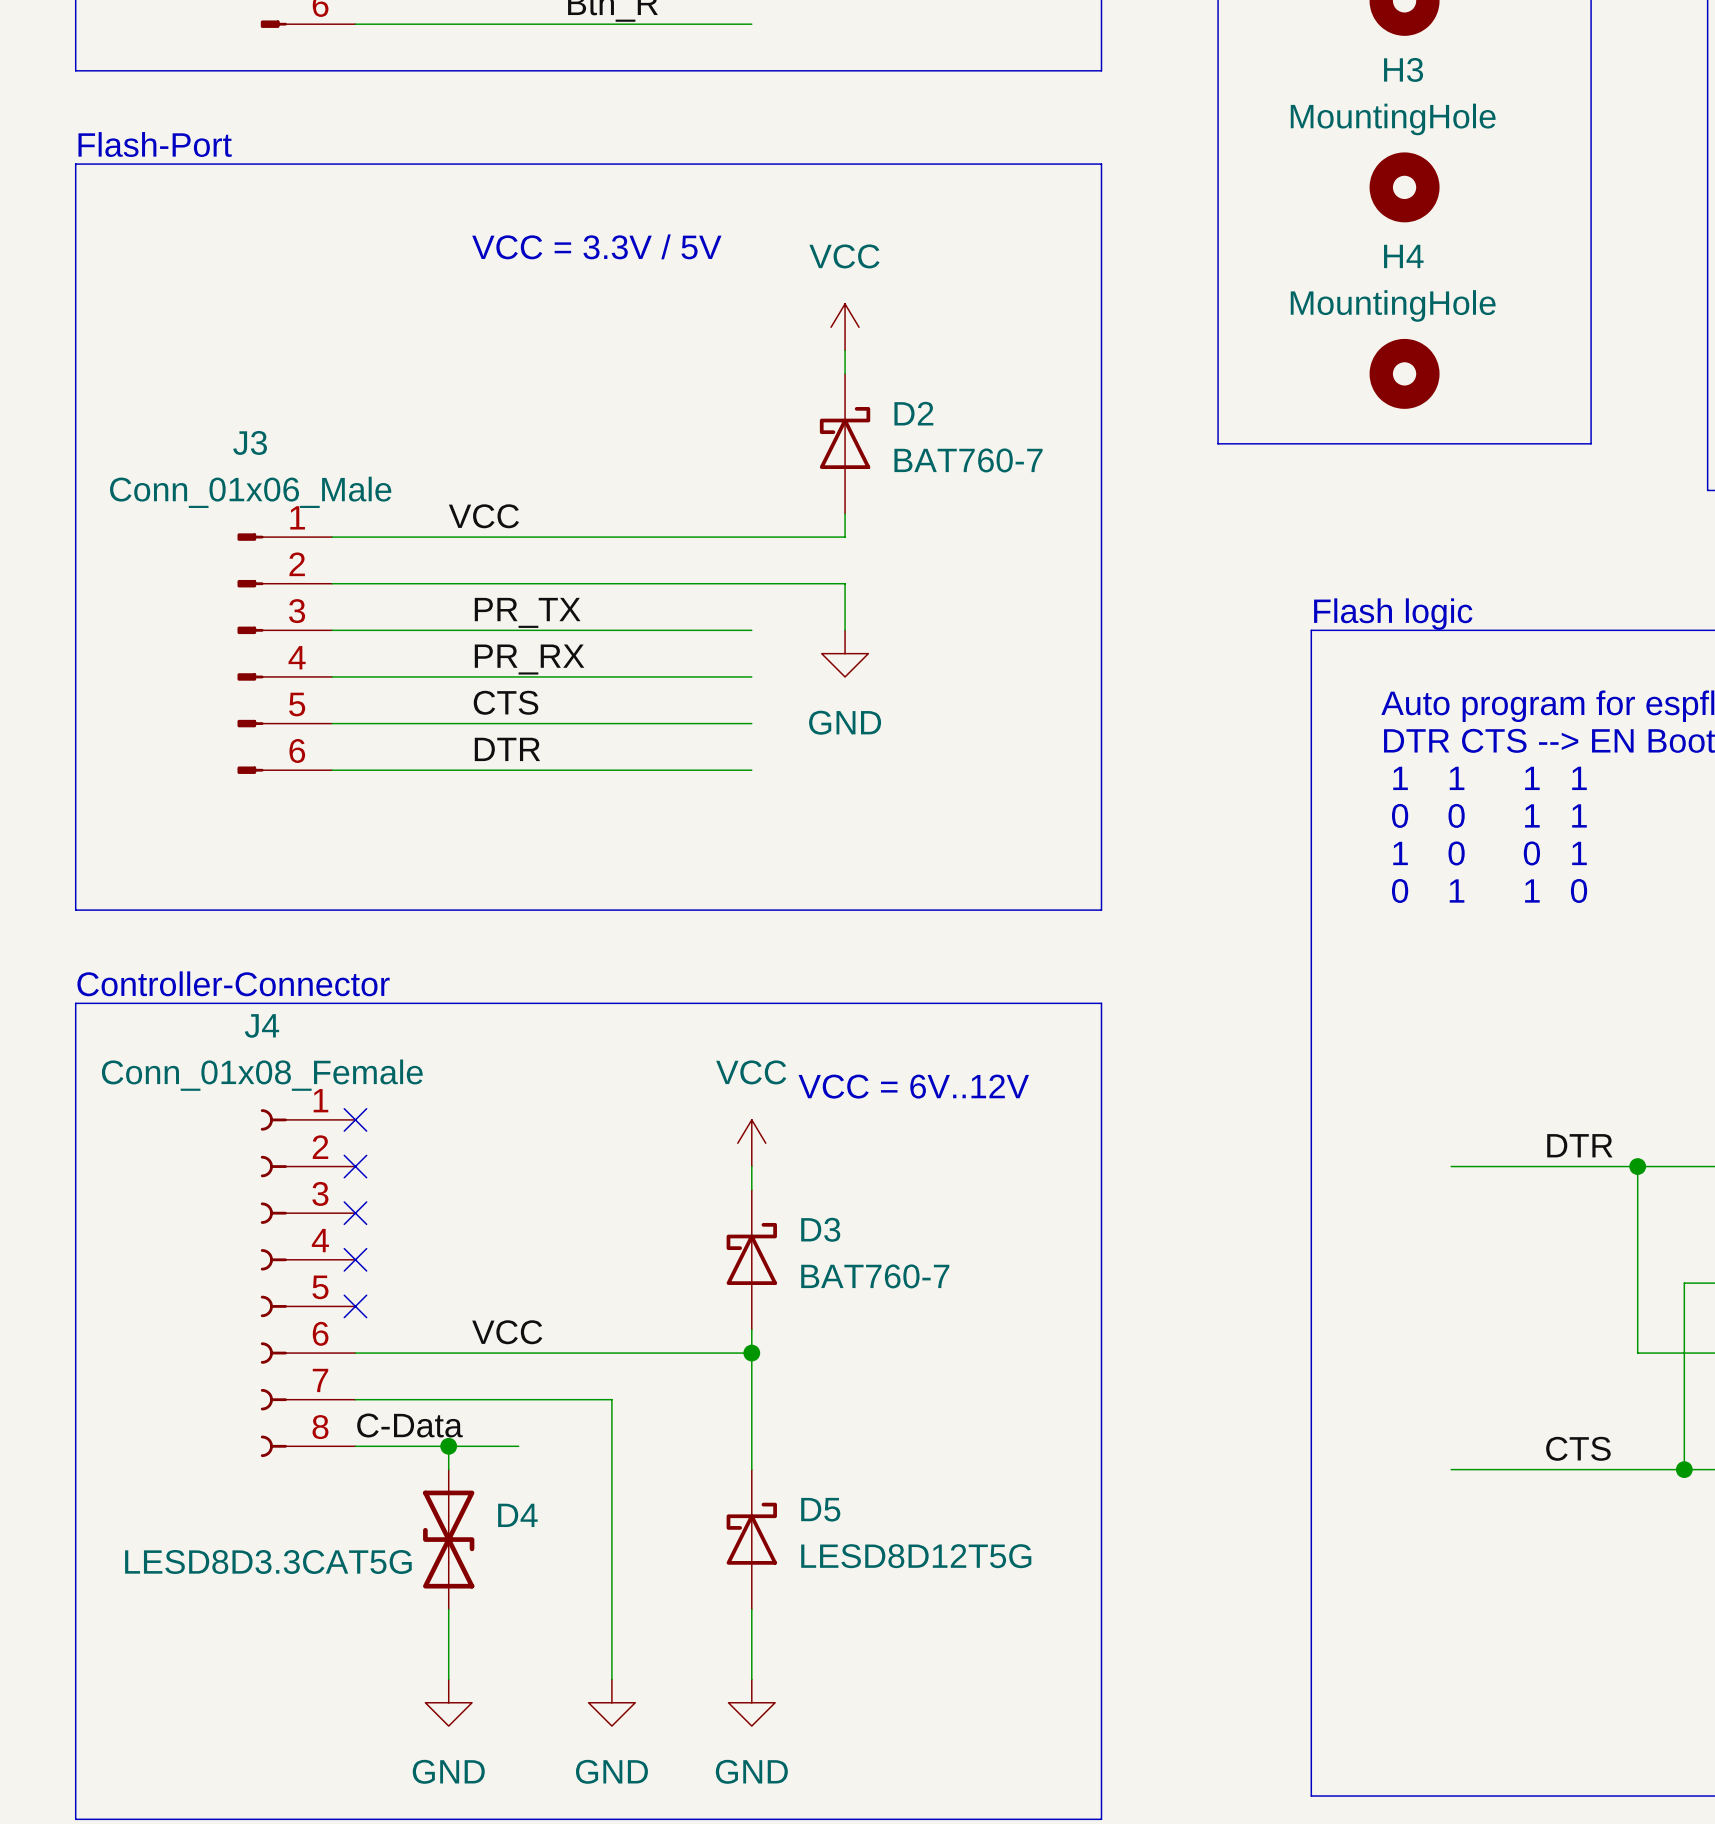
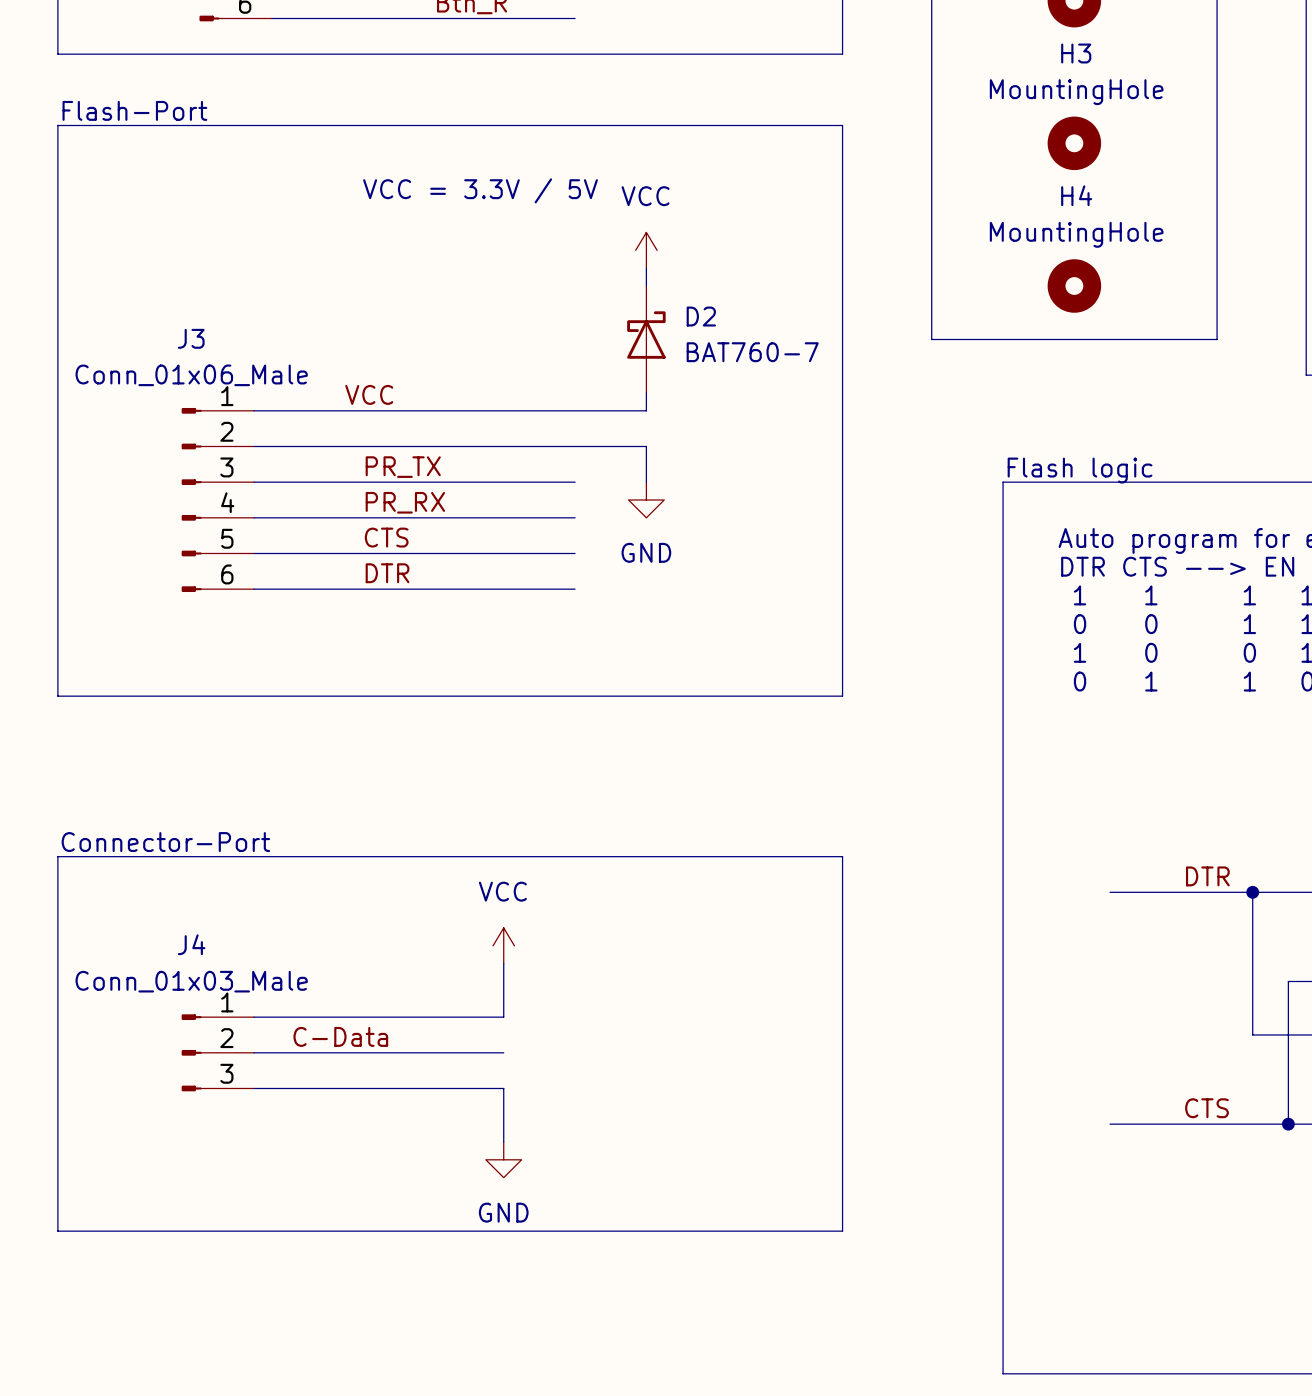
text: Controller-Connector (233, 983) -> none
J4 name position: J4 (261, 1025) -> J4 (191, 944)
J4 value: Conn_01x08_Female (262, 1075) -> Conn_01x03_Male (191, 981)
text: VCC = 6V..12V (913, 1086) -> none
text: none -> Connector-Port (165, 842)
J4 symbol: [260, 1109, 356, 1458] -> [181, 1014, 255, 1092]
line: (75, 1119) (75, 1003) (1101, 1003) (1101, 1119) -> (57, 856) (842, 856)
no-connect mark: (355, 1119) -> none
power symbol position: VCC (751, 1143) -> VCC (503, 945)
no-connect mark: (355, 1166) -> none
wire: (751, 1166) (751, 1189) -> none
no-connect mark: (355, 1213) -> none
no-connect mark: (355, 1259) -> none
wire: none -> (503, 963) (503, 1017) (254, 1017)
D3: BAT760-7 (751, 1259) -> none
no-connect mark: (355, 1306) -> none
wire: (751, 1329) (751, 1469) -> none
label: VCC (507, 1332) -> none
wire: (355, 1353) (751, 1353) -> none
junction: (751, 1353) -> none
wire: none -> (254, 1052) (503, 1052)
wire: (355, 1399) (611, 1399) (611, 1679) -> none
wire: none -> (254, 1088) (503, 1088) (503, 1141)
label position: C-Data (409, 1425) -> C-Data (340, 1036)
wire: (355, 1446) (518, 1446) -> none
wire: (448, 1446) (448, 1469) -> none
junction: (448, 1446) -> none
power symbol: none -> GND (503, 1159)
D4: LESD8D3.3CAT5G (448, 1539) -> none
D5: LESD8D12T5G (751, 1539) -> none
line: (75, 1609) (75, 1819) (1101, 1819) (1101, 1609) -> (57, 1231) (842, 1231)
wire: (448, 1609) (448, 1679) -> none
wire: (751, 1609) (751, 1679) -> none
power symbol: GND (448, 1702) -> none
power symbol: GND (611, 1702) -> none
power symbol: GND (751, 1702) -> none

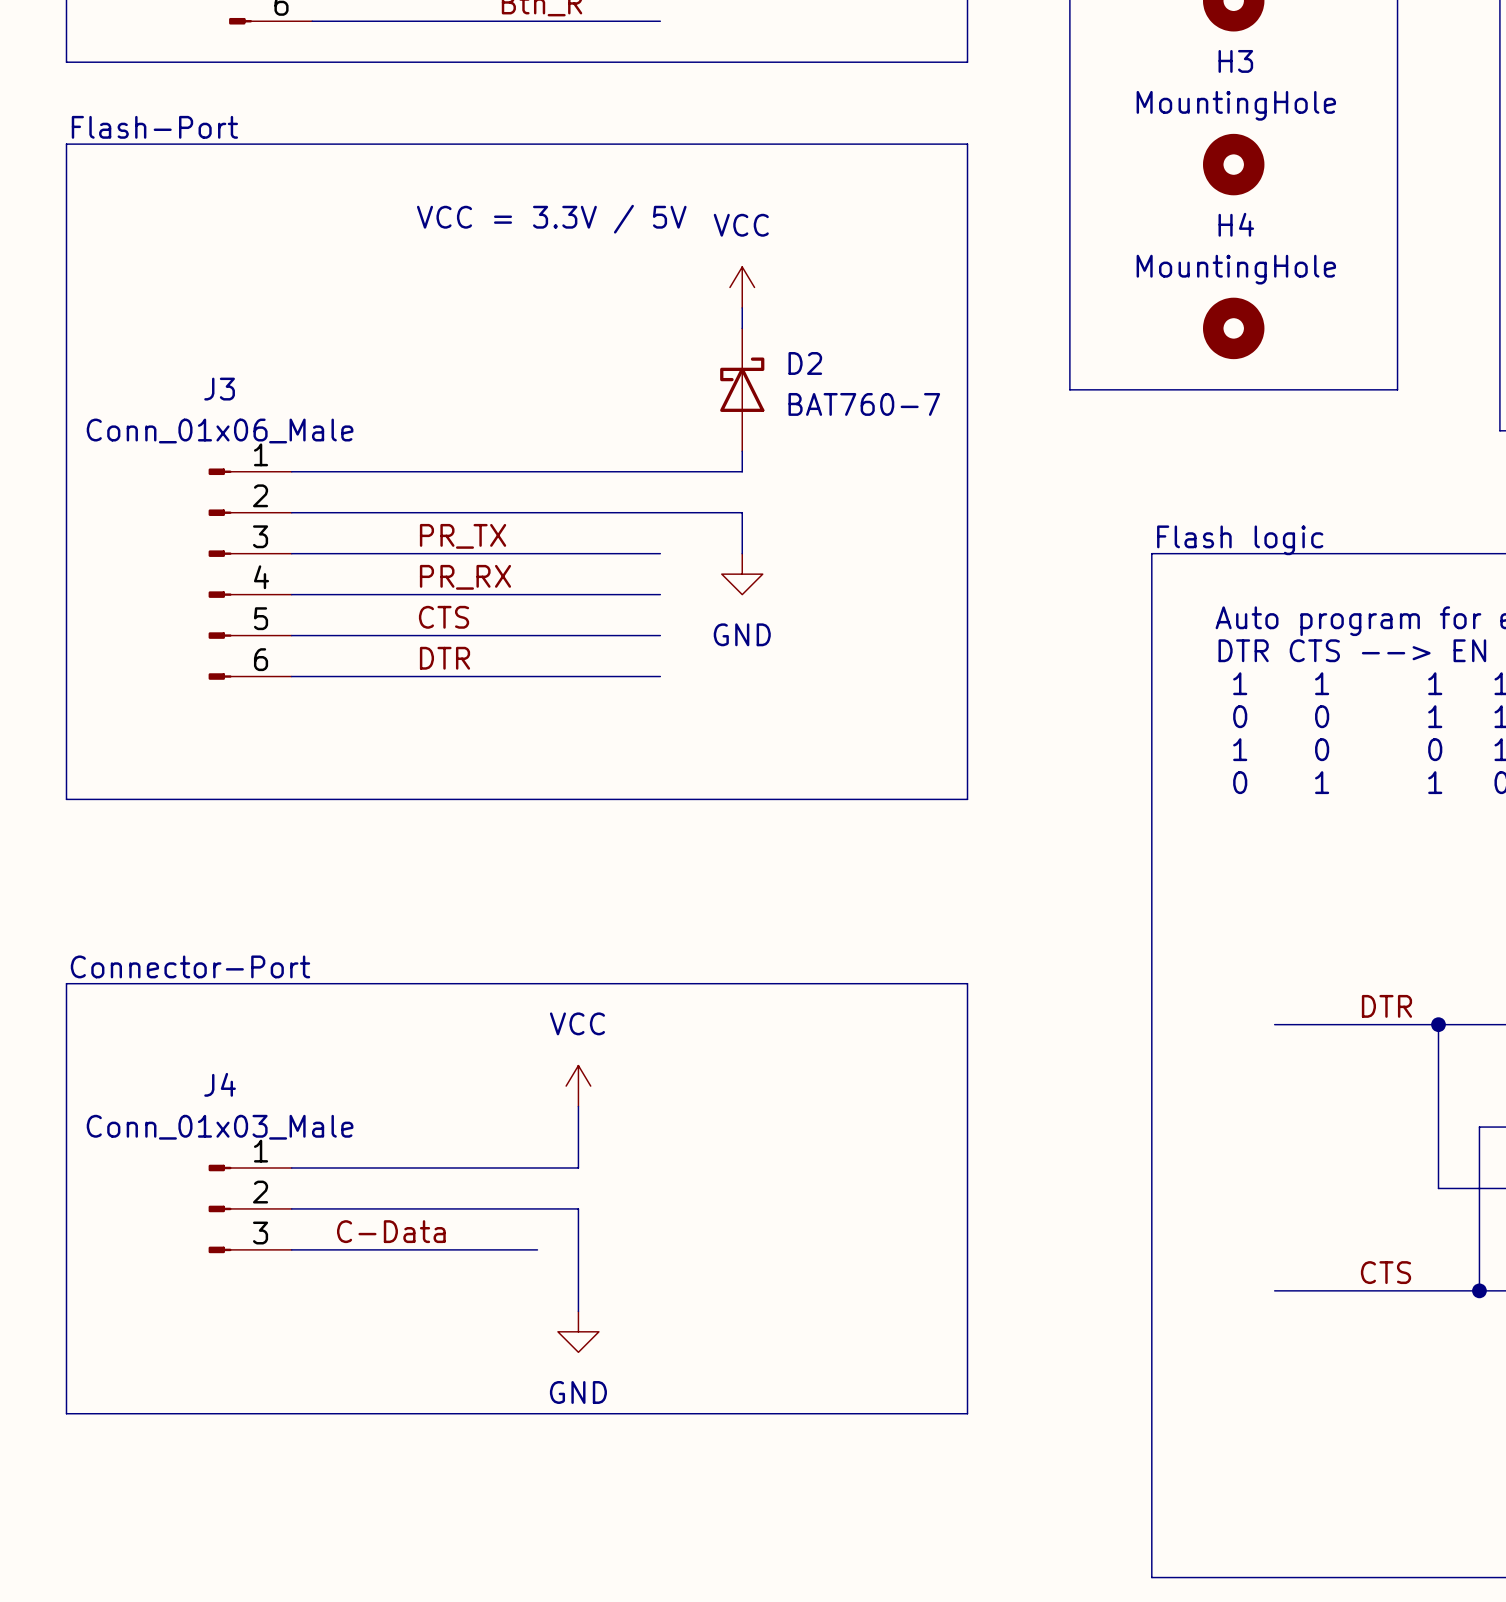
label: VCC (369, 394) -> none
label position: C-Data (340, 1036) -> C-Data (391, 1231)
wire: (468, 1088) (503, 1088) -> (578, 1208) (578, 1249)

